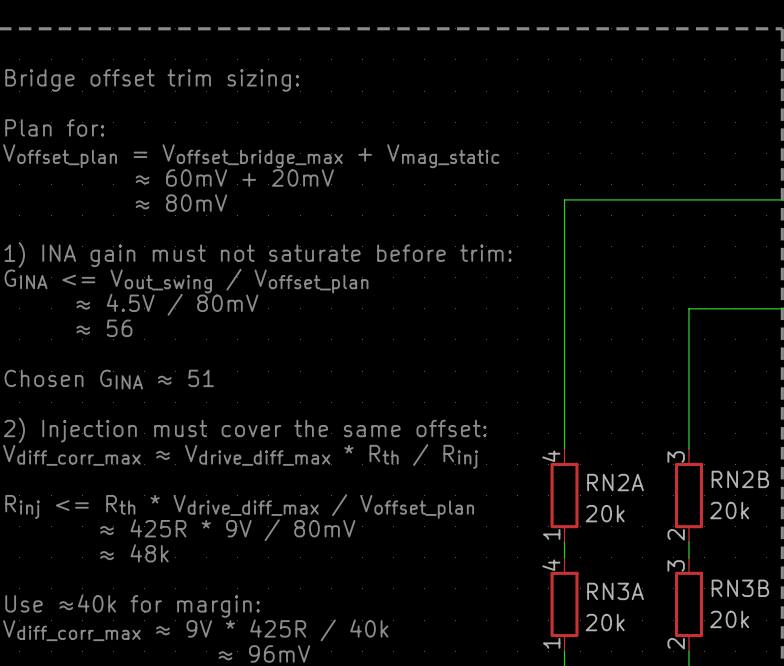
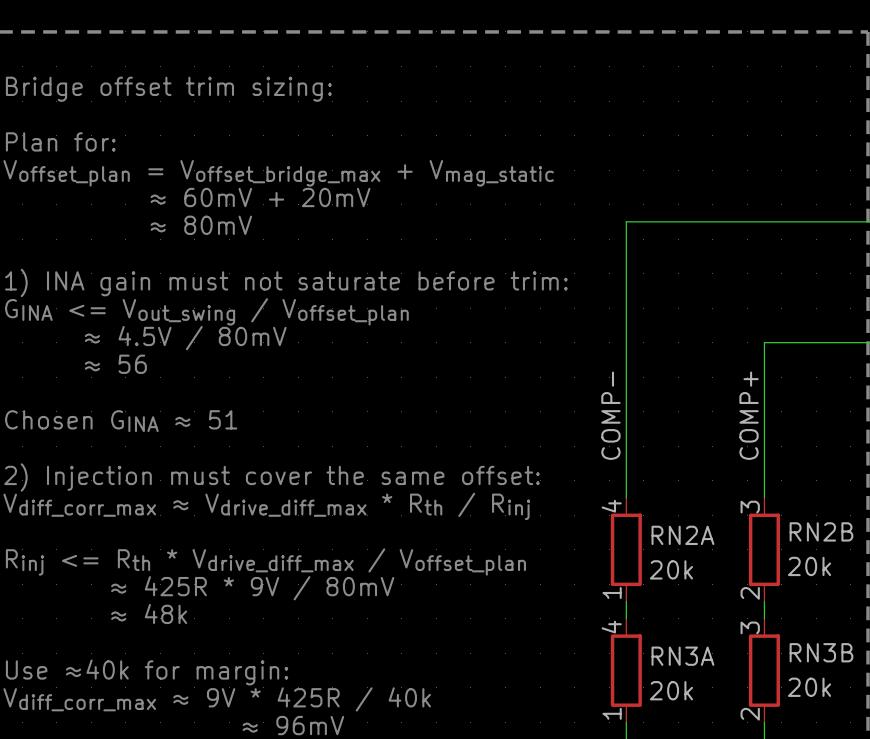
label: none -> COMP- (610, 415)
label: none -> COMP+ (749, 415)

